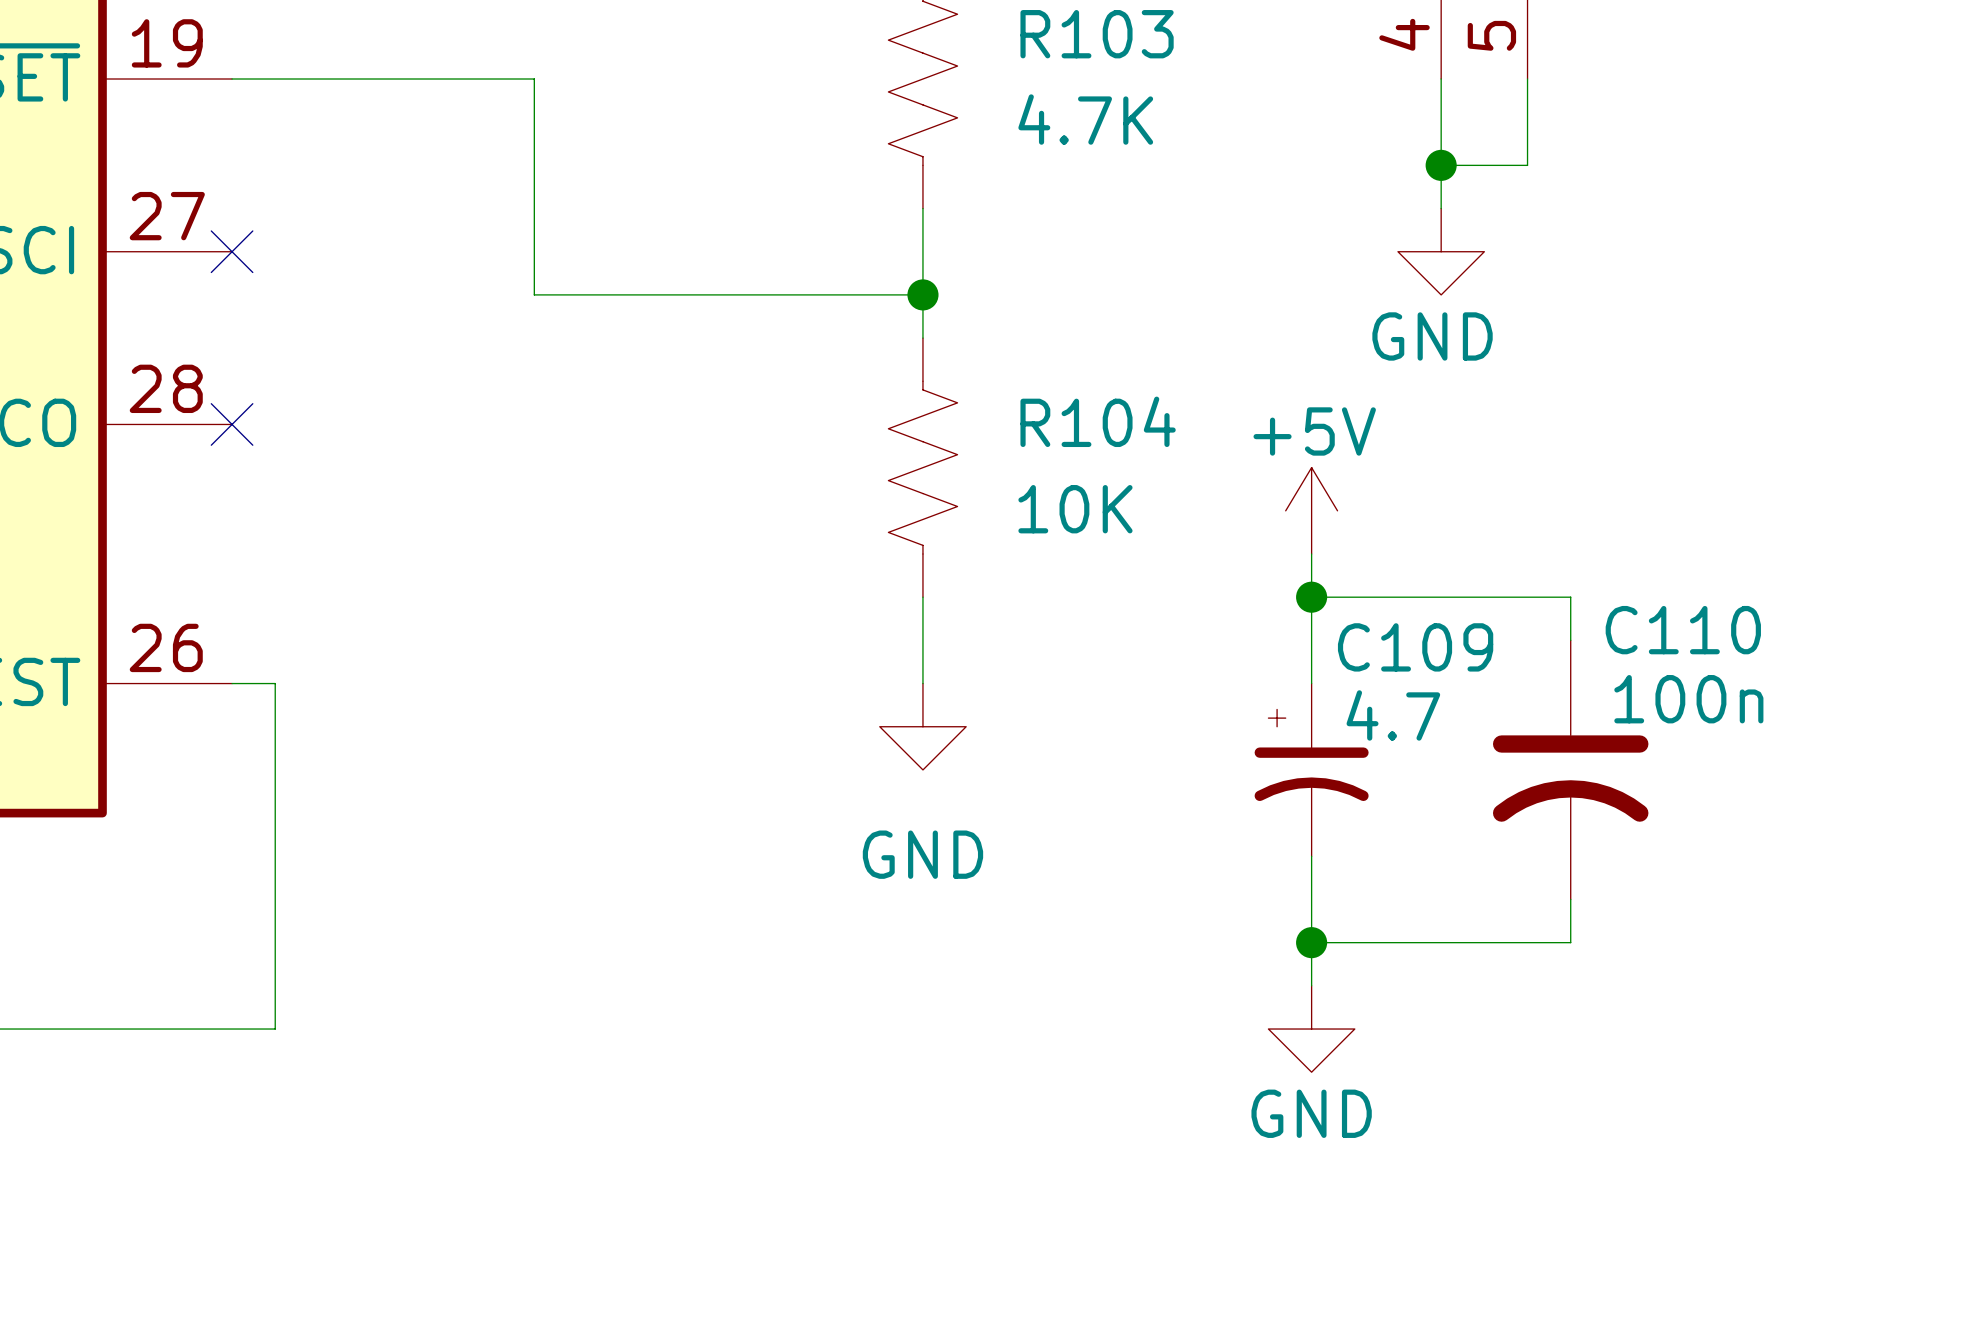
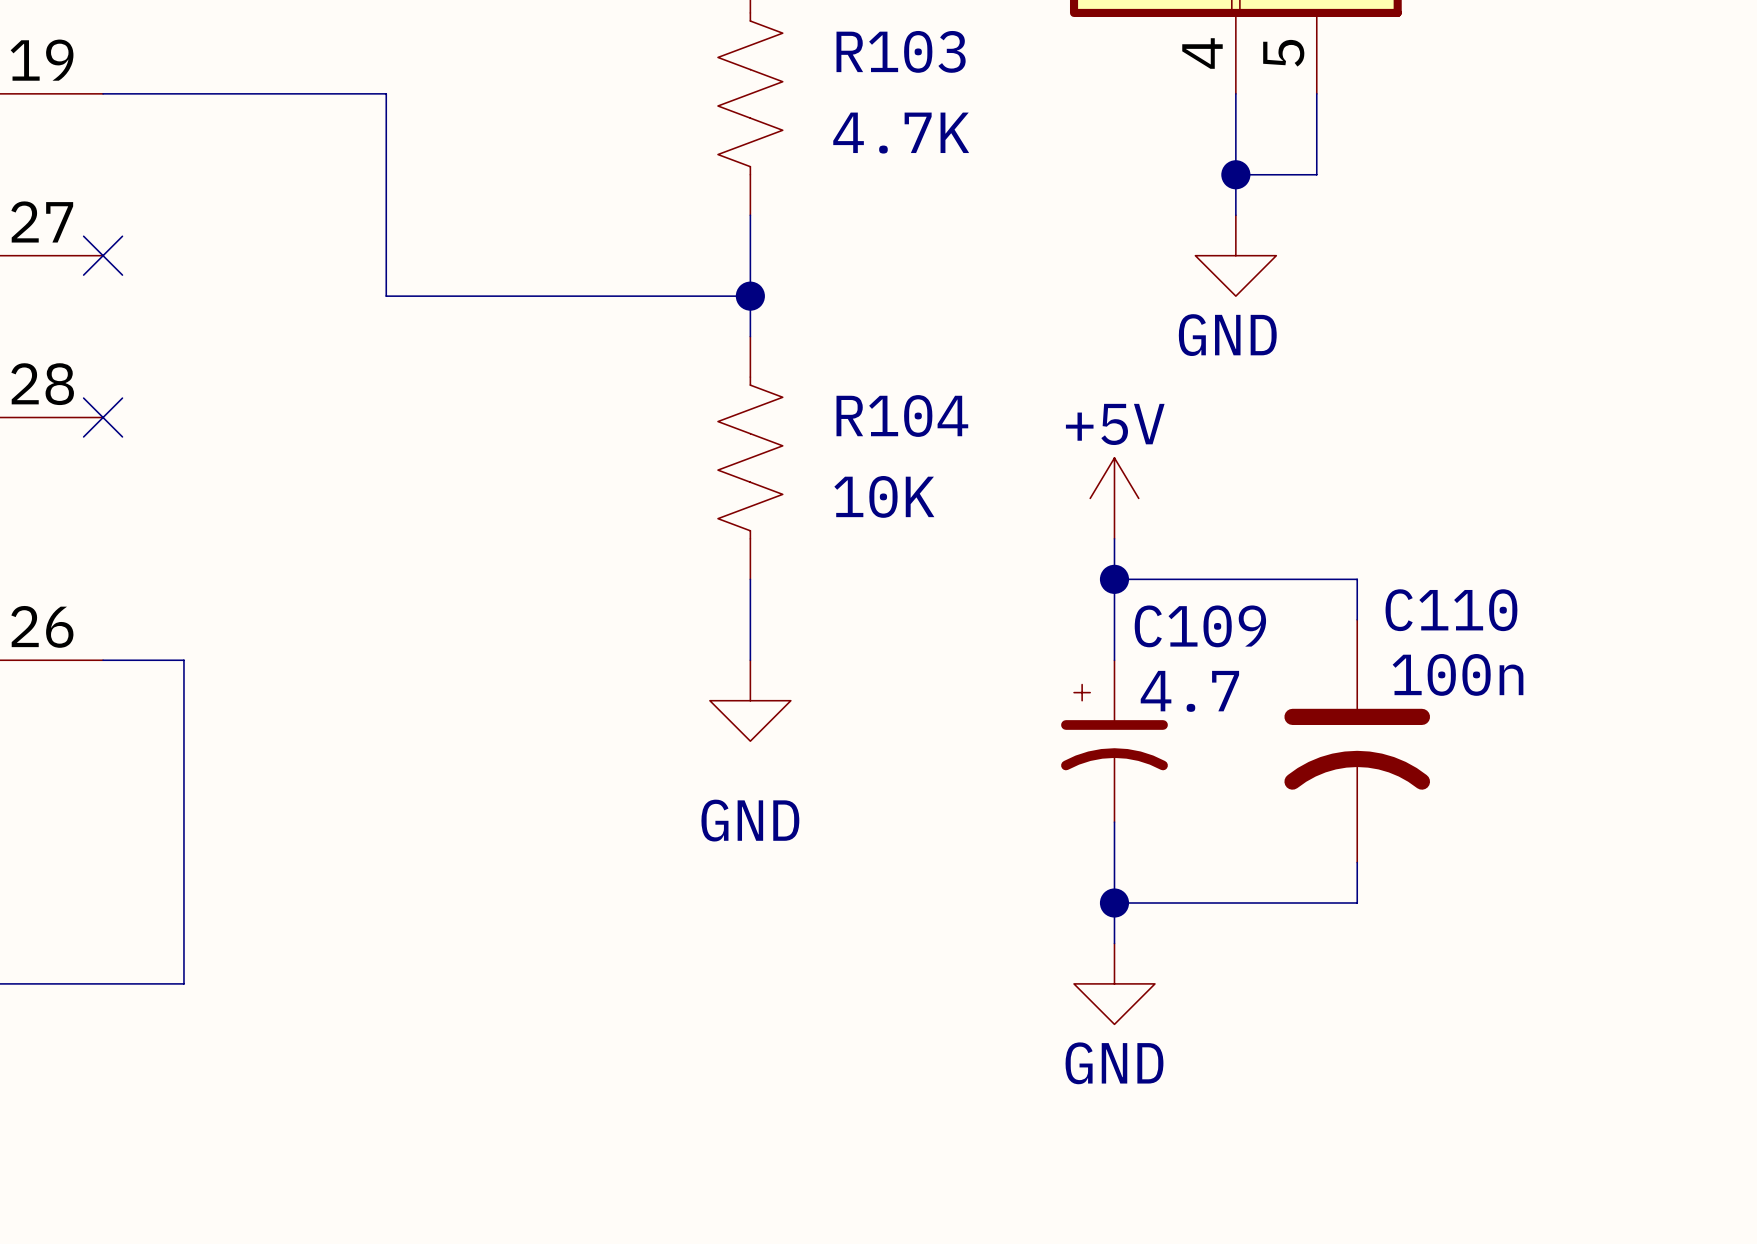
wire: (275, 683) (275, 1029) -> (143, 660) (183, 660) (183, 983) (143, 983)

